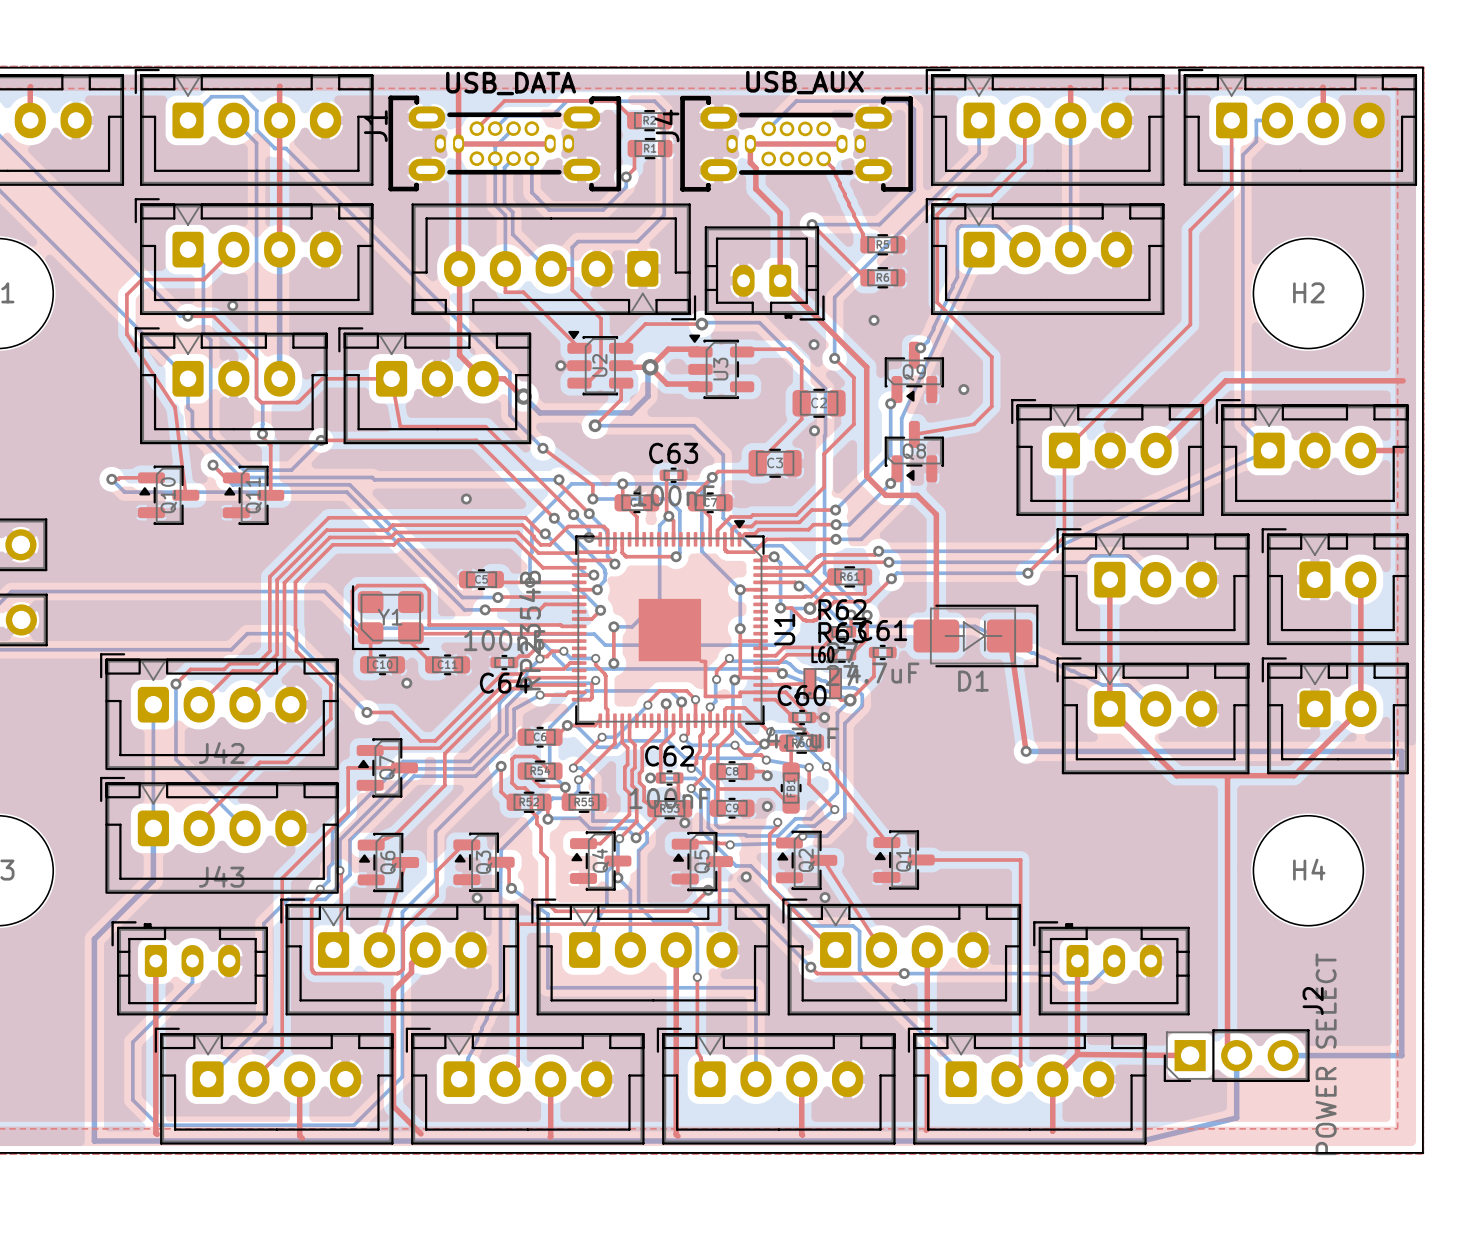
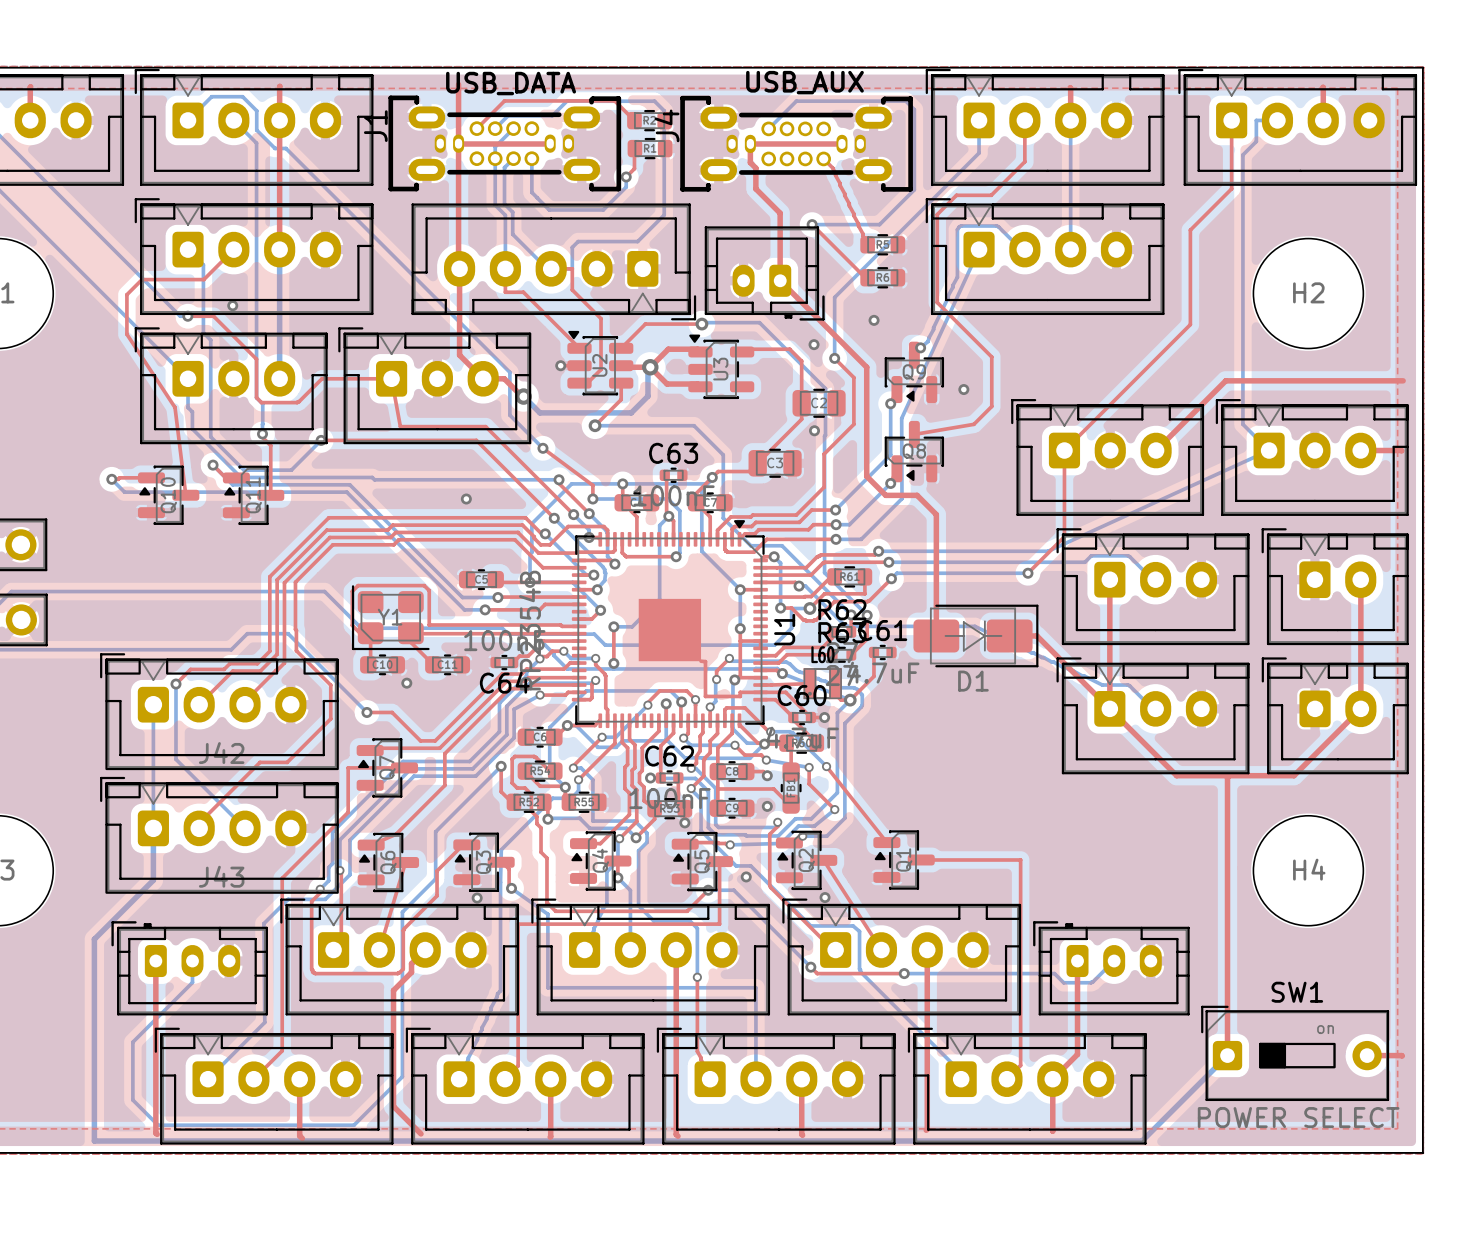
top track: (1009, 635) (1026, 751) -> (1009, 635) (1036, 635) (1109, 708)
bottom track: (1026, 751) (1401, 751) (1401, 1055) (1283, 1055) -> none
via: (1026, 751) -> none
SW1: none -> POWER SELECT (1295, 1053)
top track: (1077, 1054) (1190, 1055) -> none
bottom track: (1236, 1055) (1236, 1117) (1142, 1141) -> (1227, 1055) (1142, 1141)
J2: POWER SELECT (1236, 1055) -> none
top track: none -> (1367, 1055) (1402, 1056)

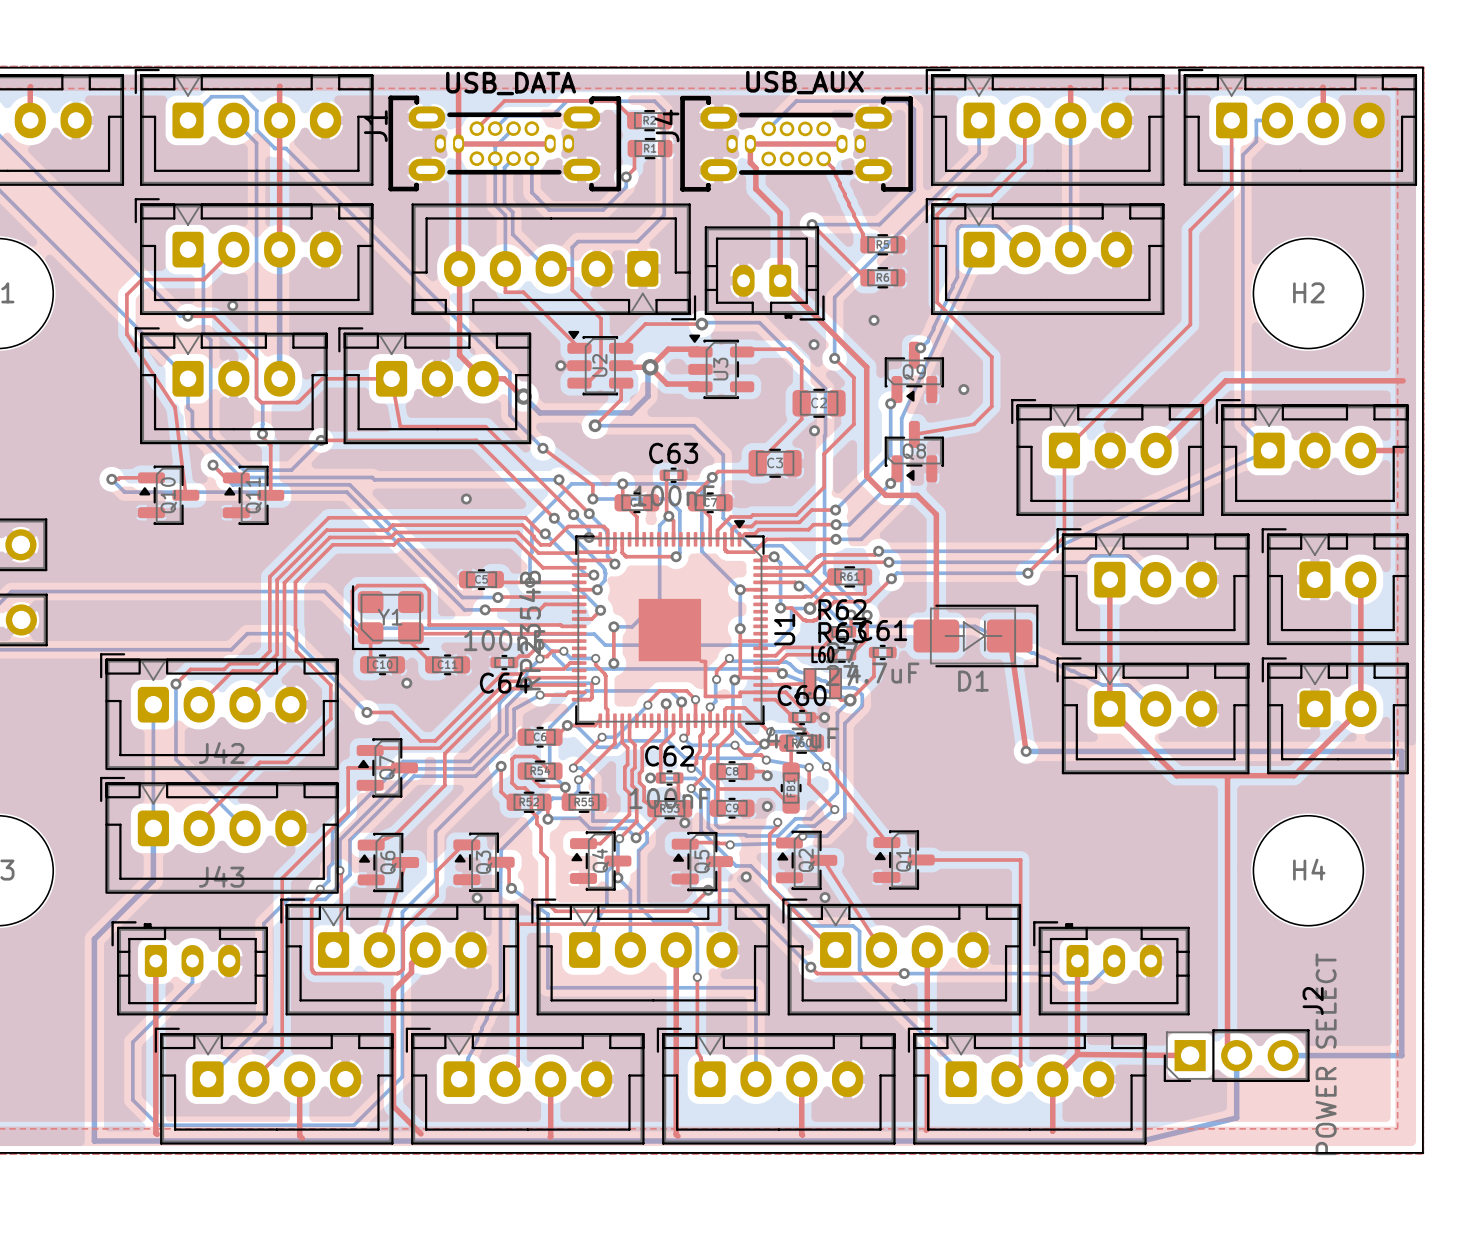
top track: (1009, 635) (1036, 635) (1109, 708) -> (1009, 635) (1026, 751)
bottom track: none -> (1026, 751) (1401, 751) (1401, 1055) (1283, 1055)
via: none -> (1026, 751)
SW1: POWER SELECT (1295, 1053) -> none
top track: none -> (1077, 1054) (1190, 1055)
bottom track: (1227, 1055) (1142, 1141) -> (1236, 1055) (1236, 1117) (1142, 1141)
J2: none -> POWER SELECT (1236, 1055)
top track: (1367, 1055) (1402, 1056) -> none

